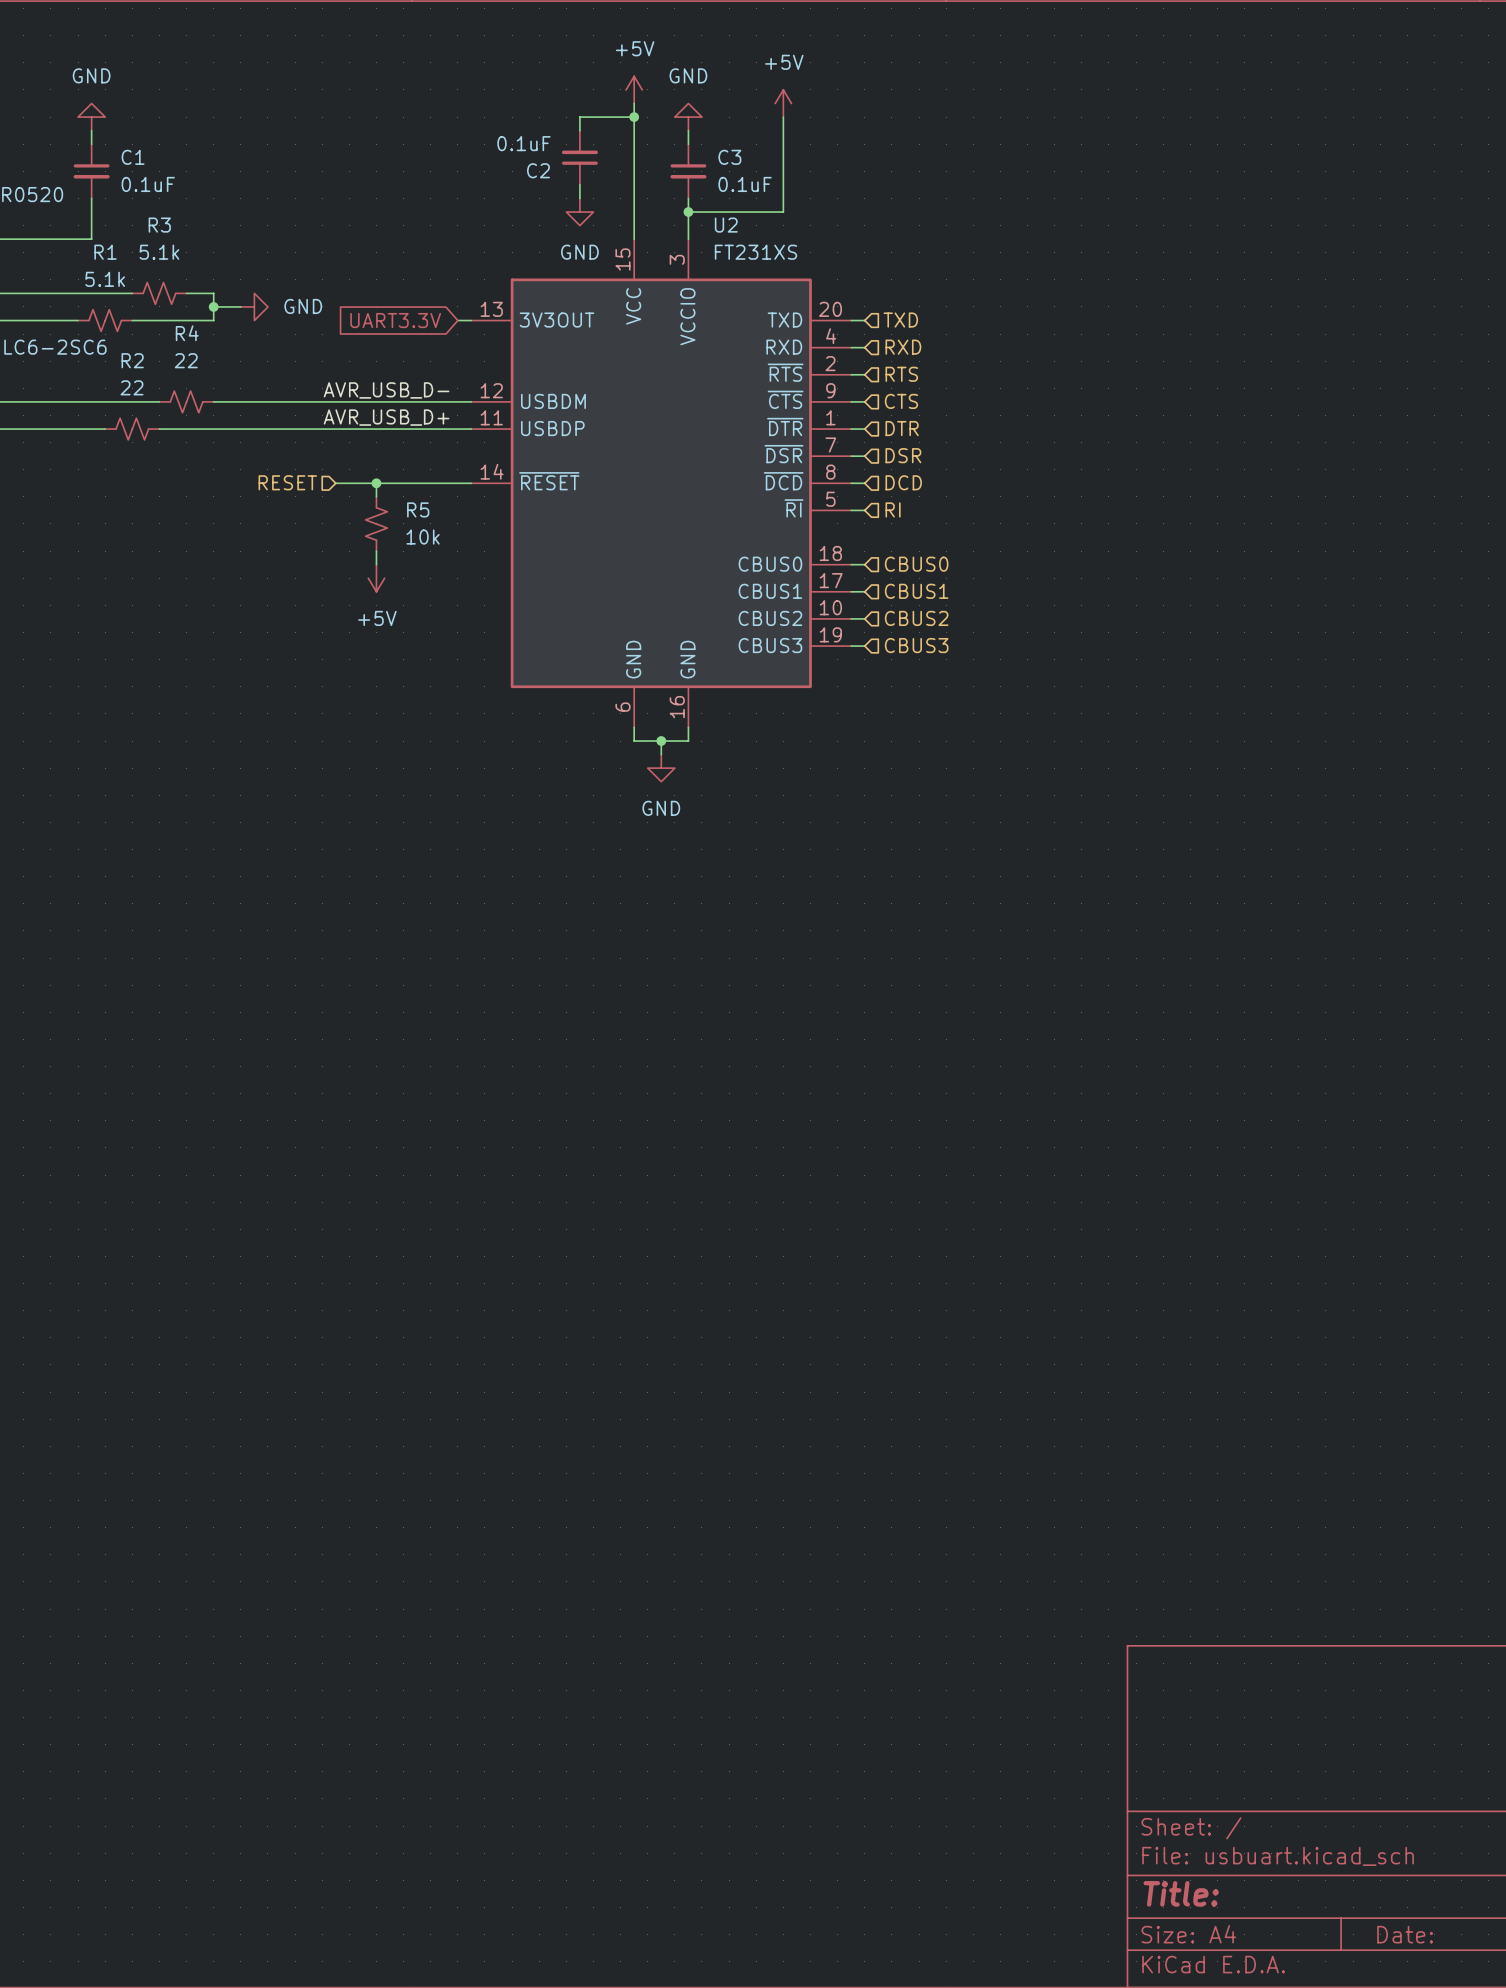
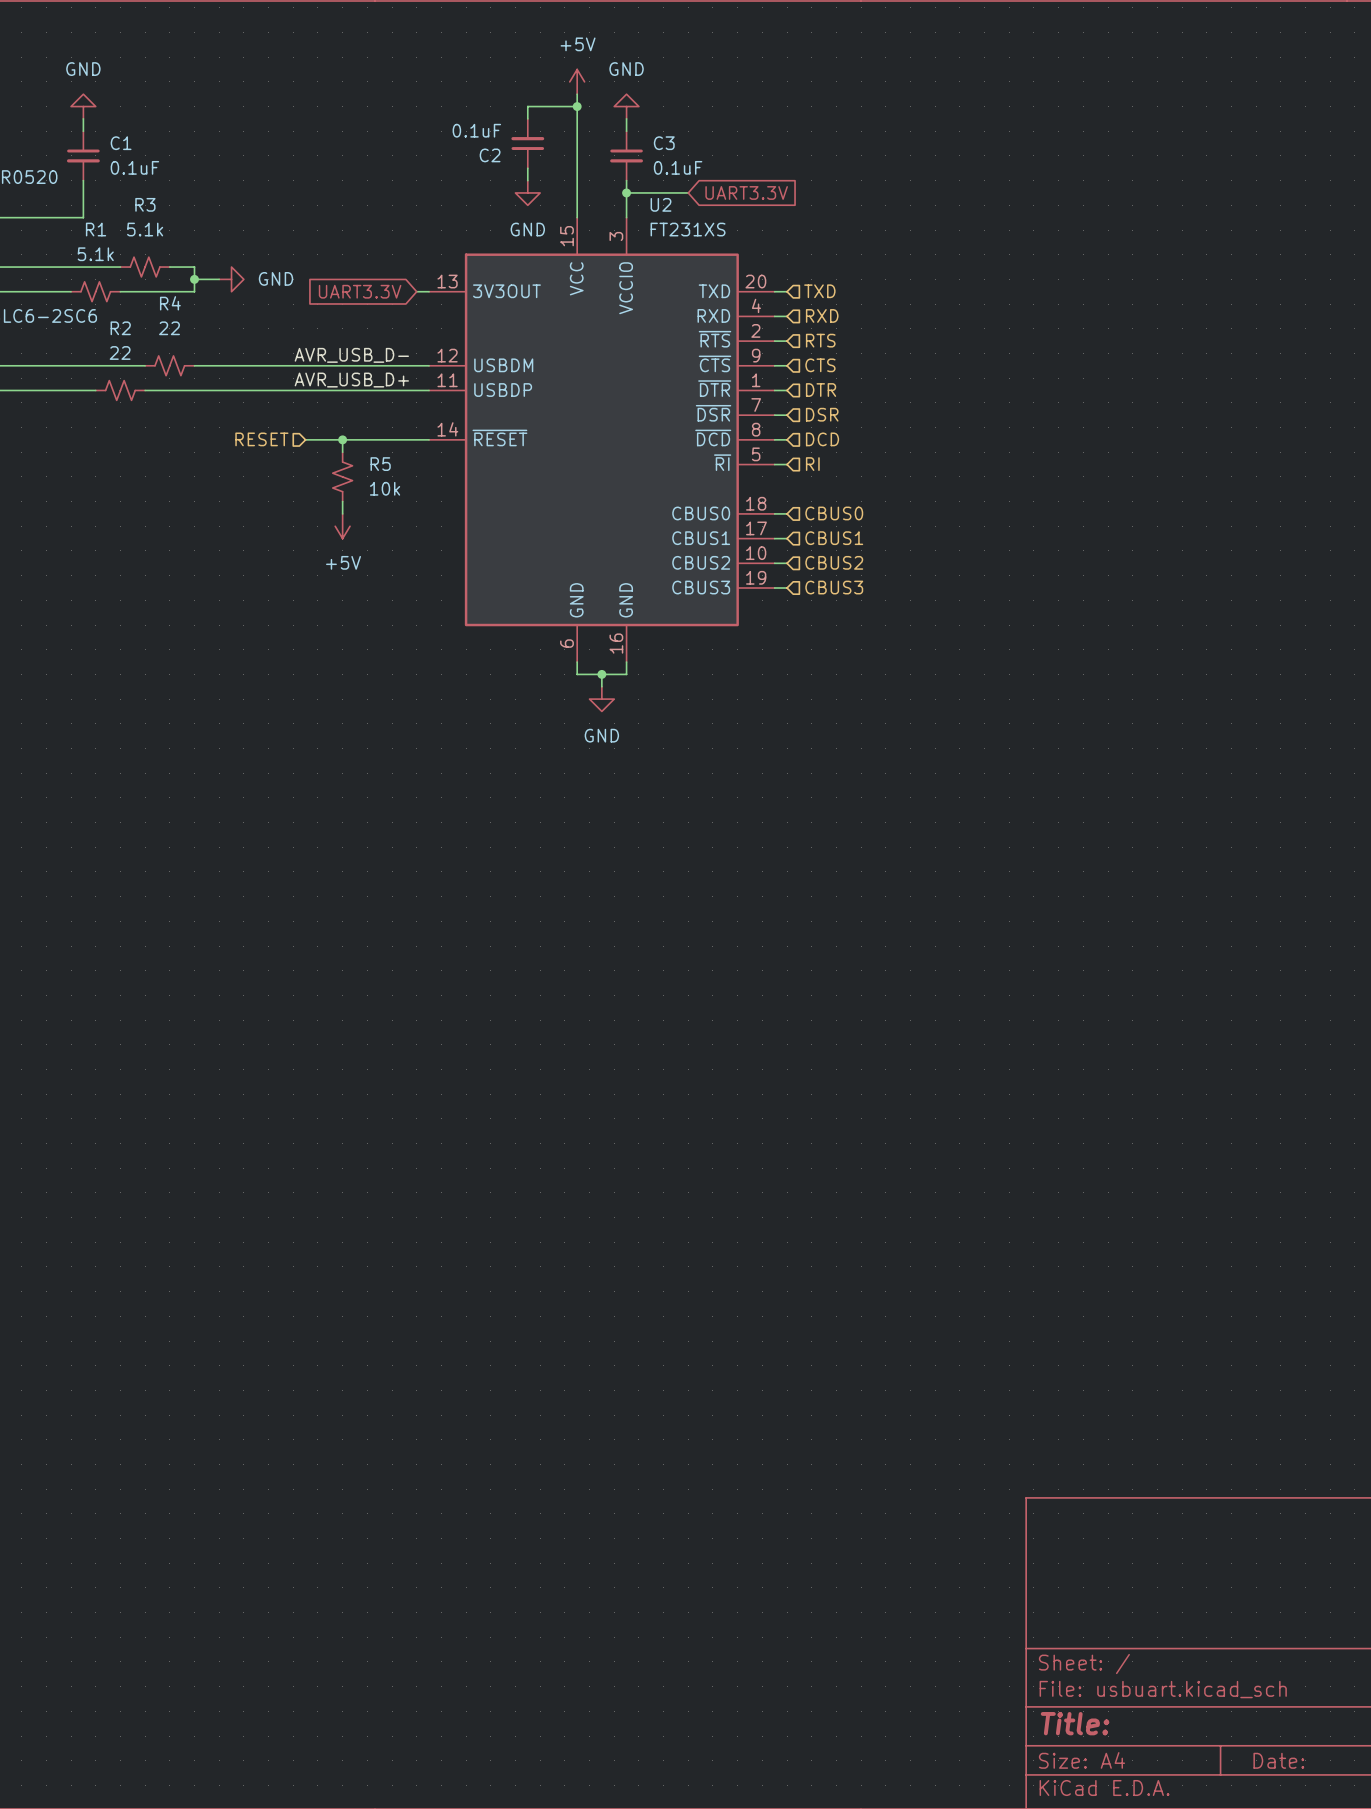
power symbol: +5V (783, 103) -> none
wire: (783, 117) (783, 212) (756, 212) -> none
global label: none -> UART3.3V (746, 192)

